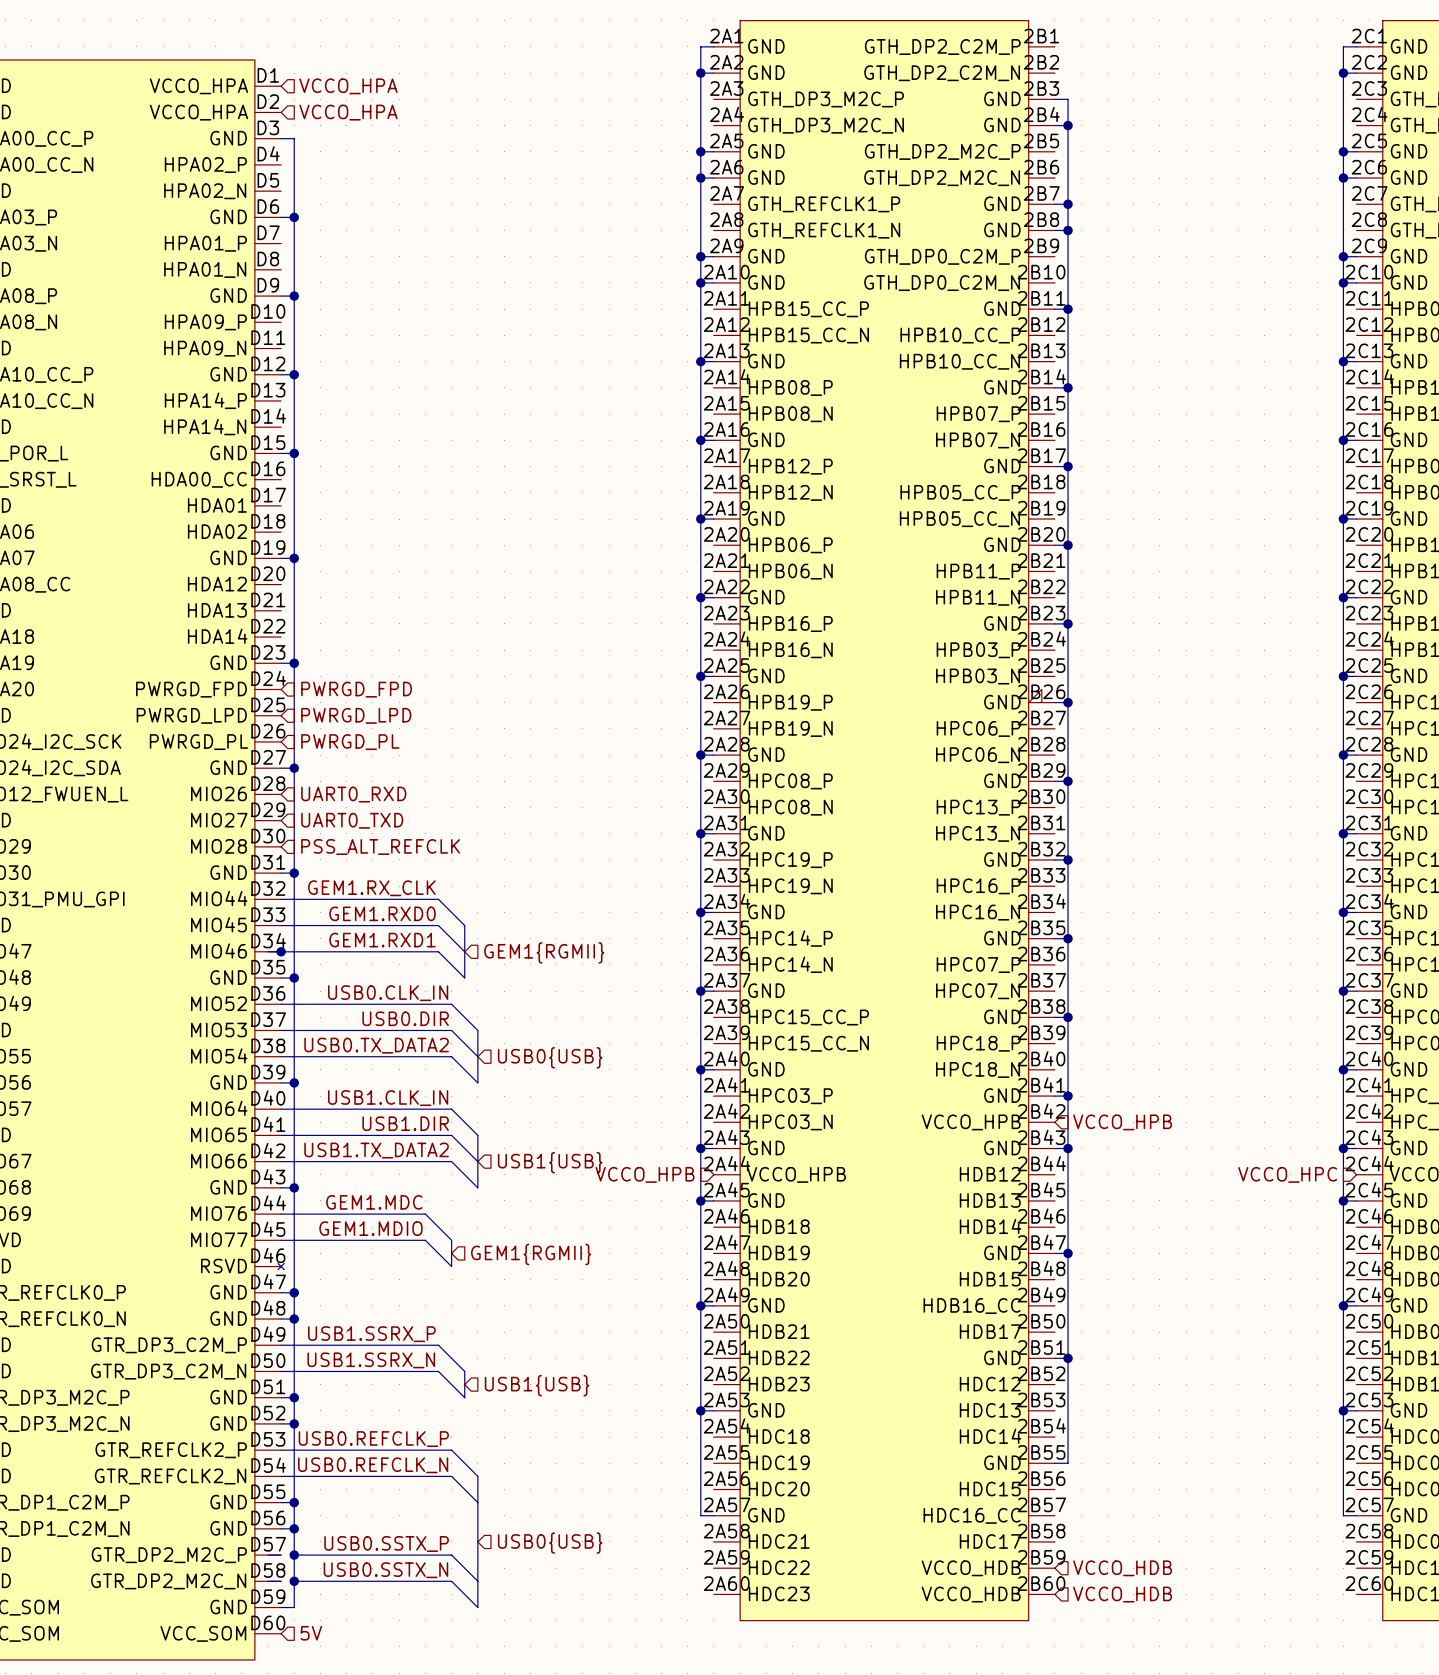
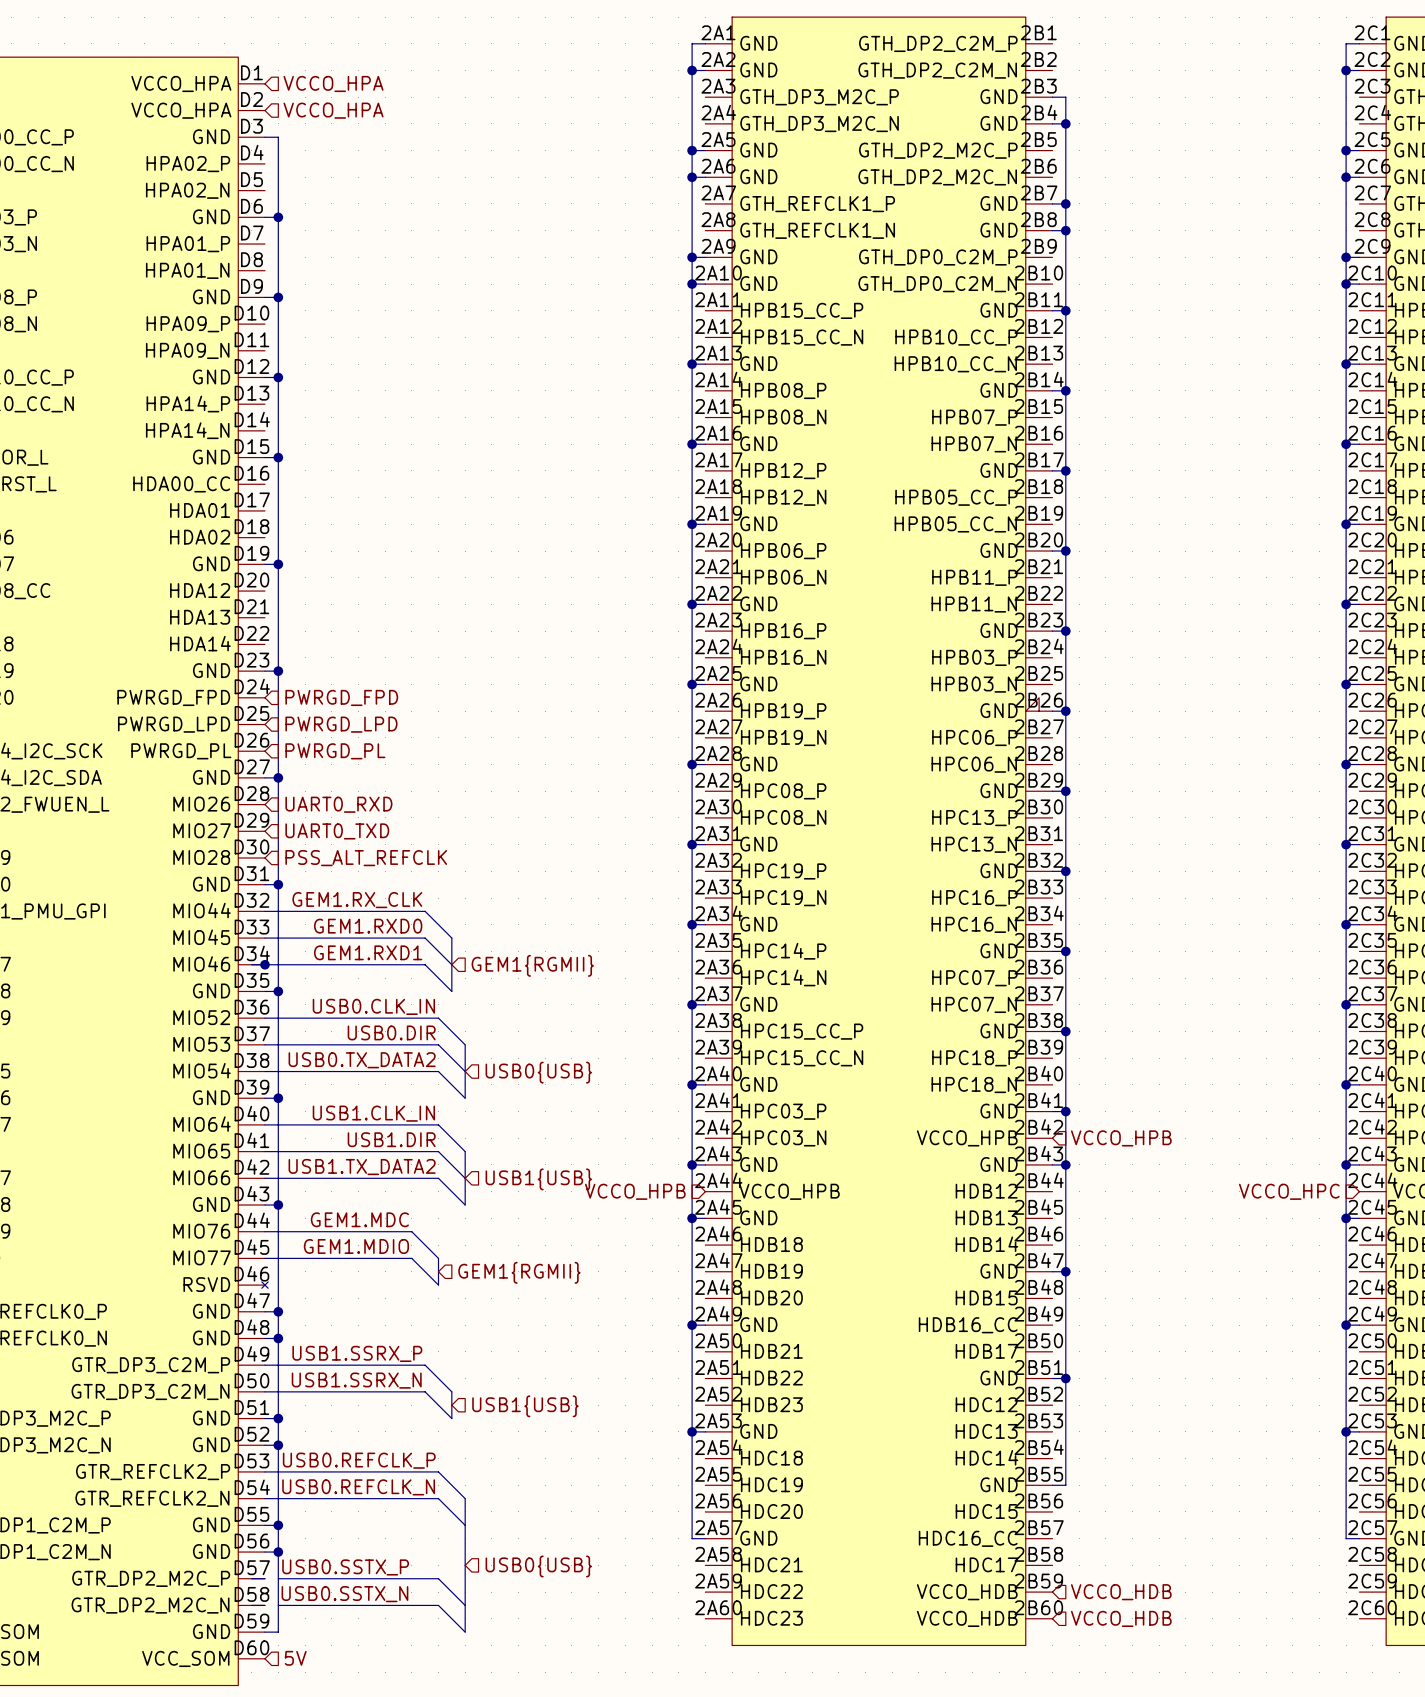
label position: USB0.SSTX_P (386, 1543) -> USB0.SSTX_P (345, 1567)
junction: (294, 1555) -> none
label position: USB0.SSTX_N (385, 1570) -> USB0.SSTX_N (344, 1594)
junction: (294, 1581) -> none

